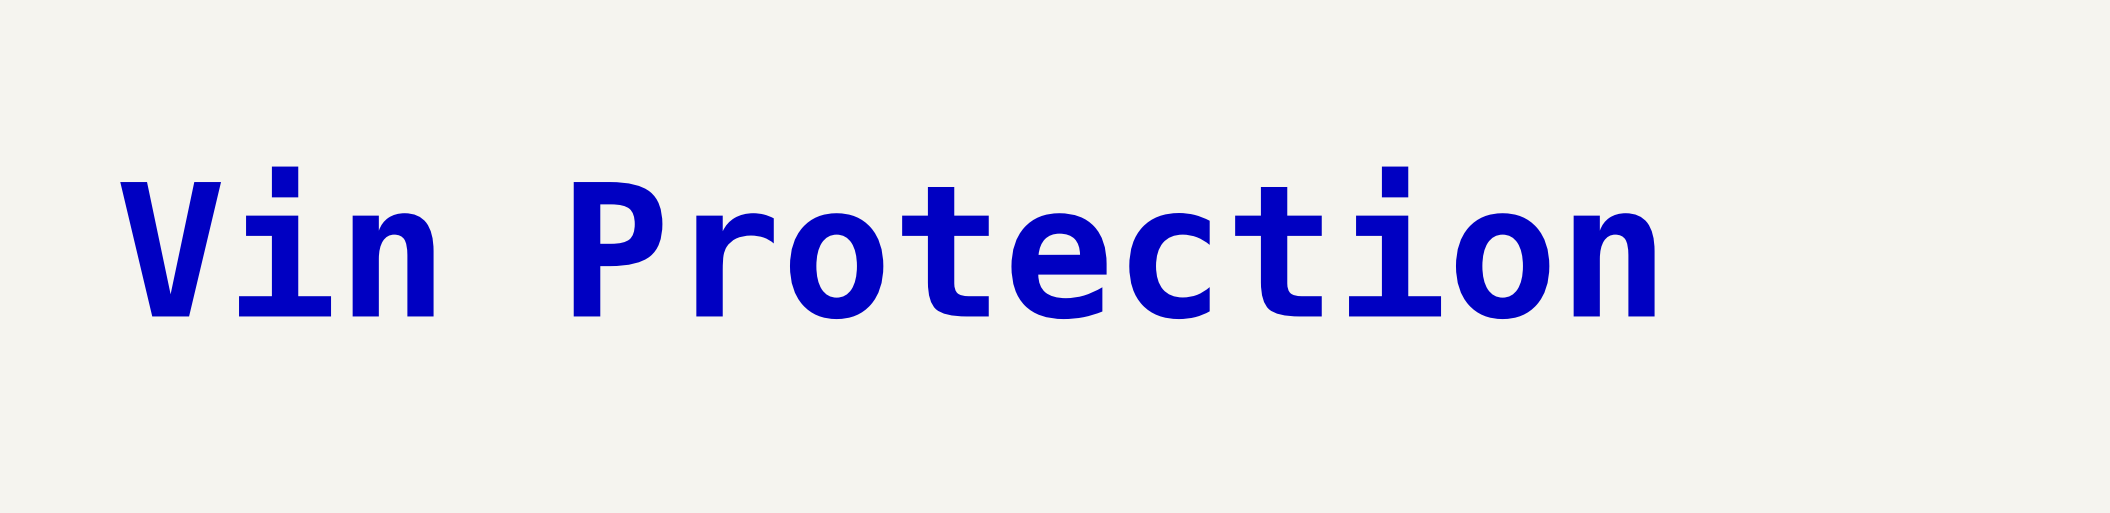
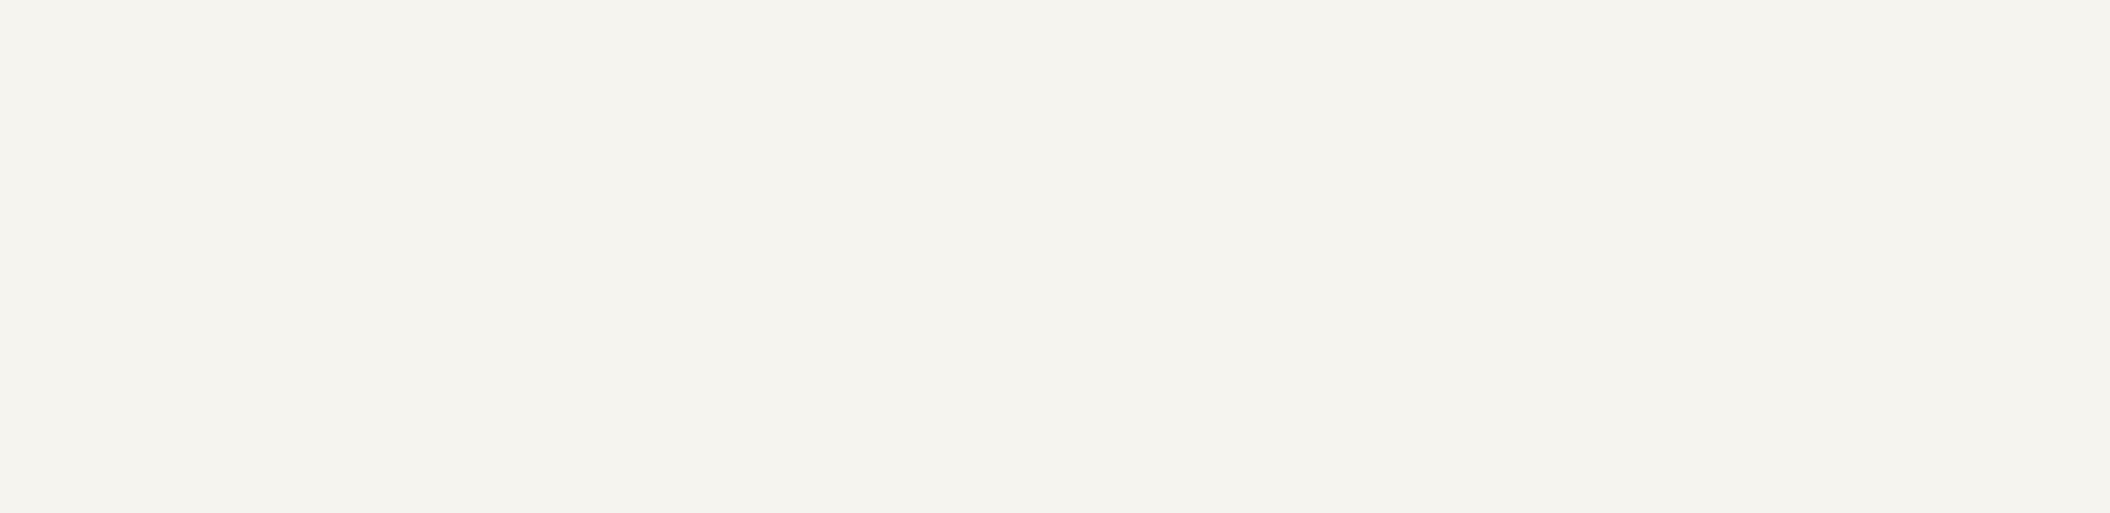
text: Vin Protection (887, 242) -> none

